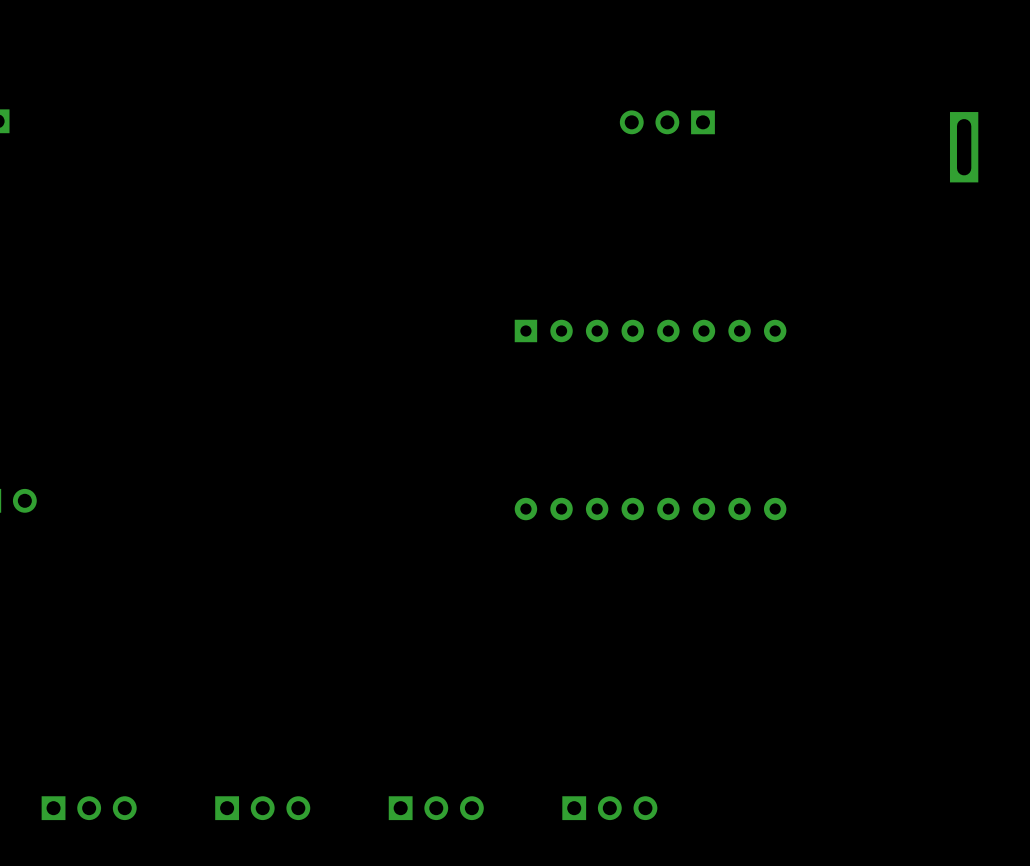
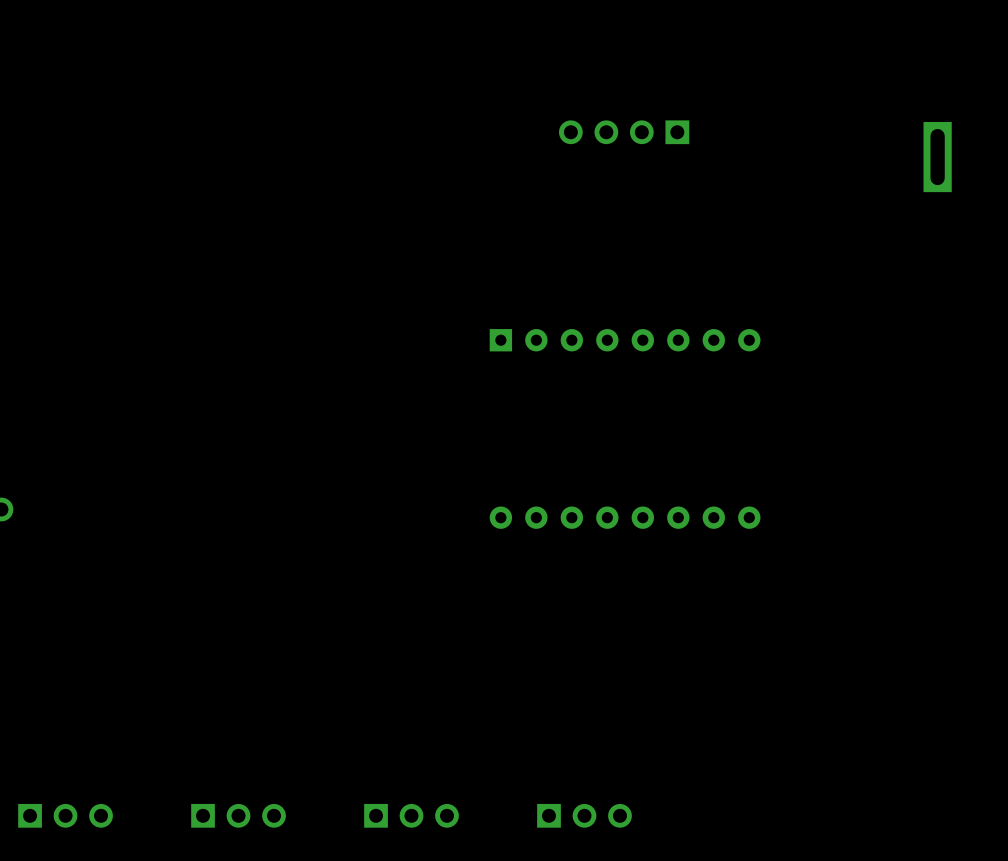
part: none -> (624, 132)

